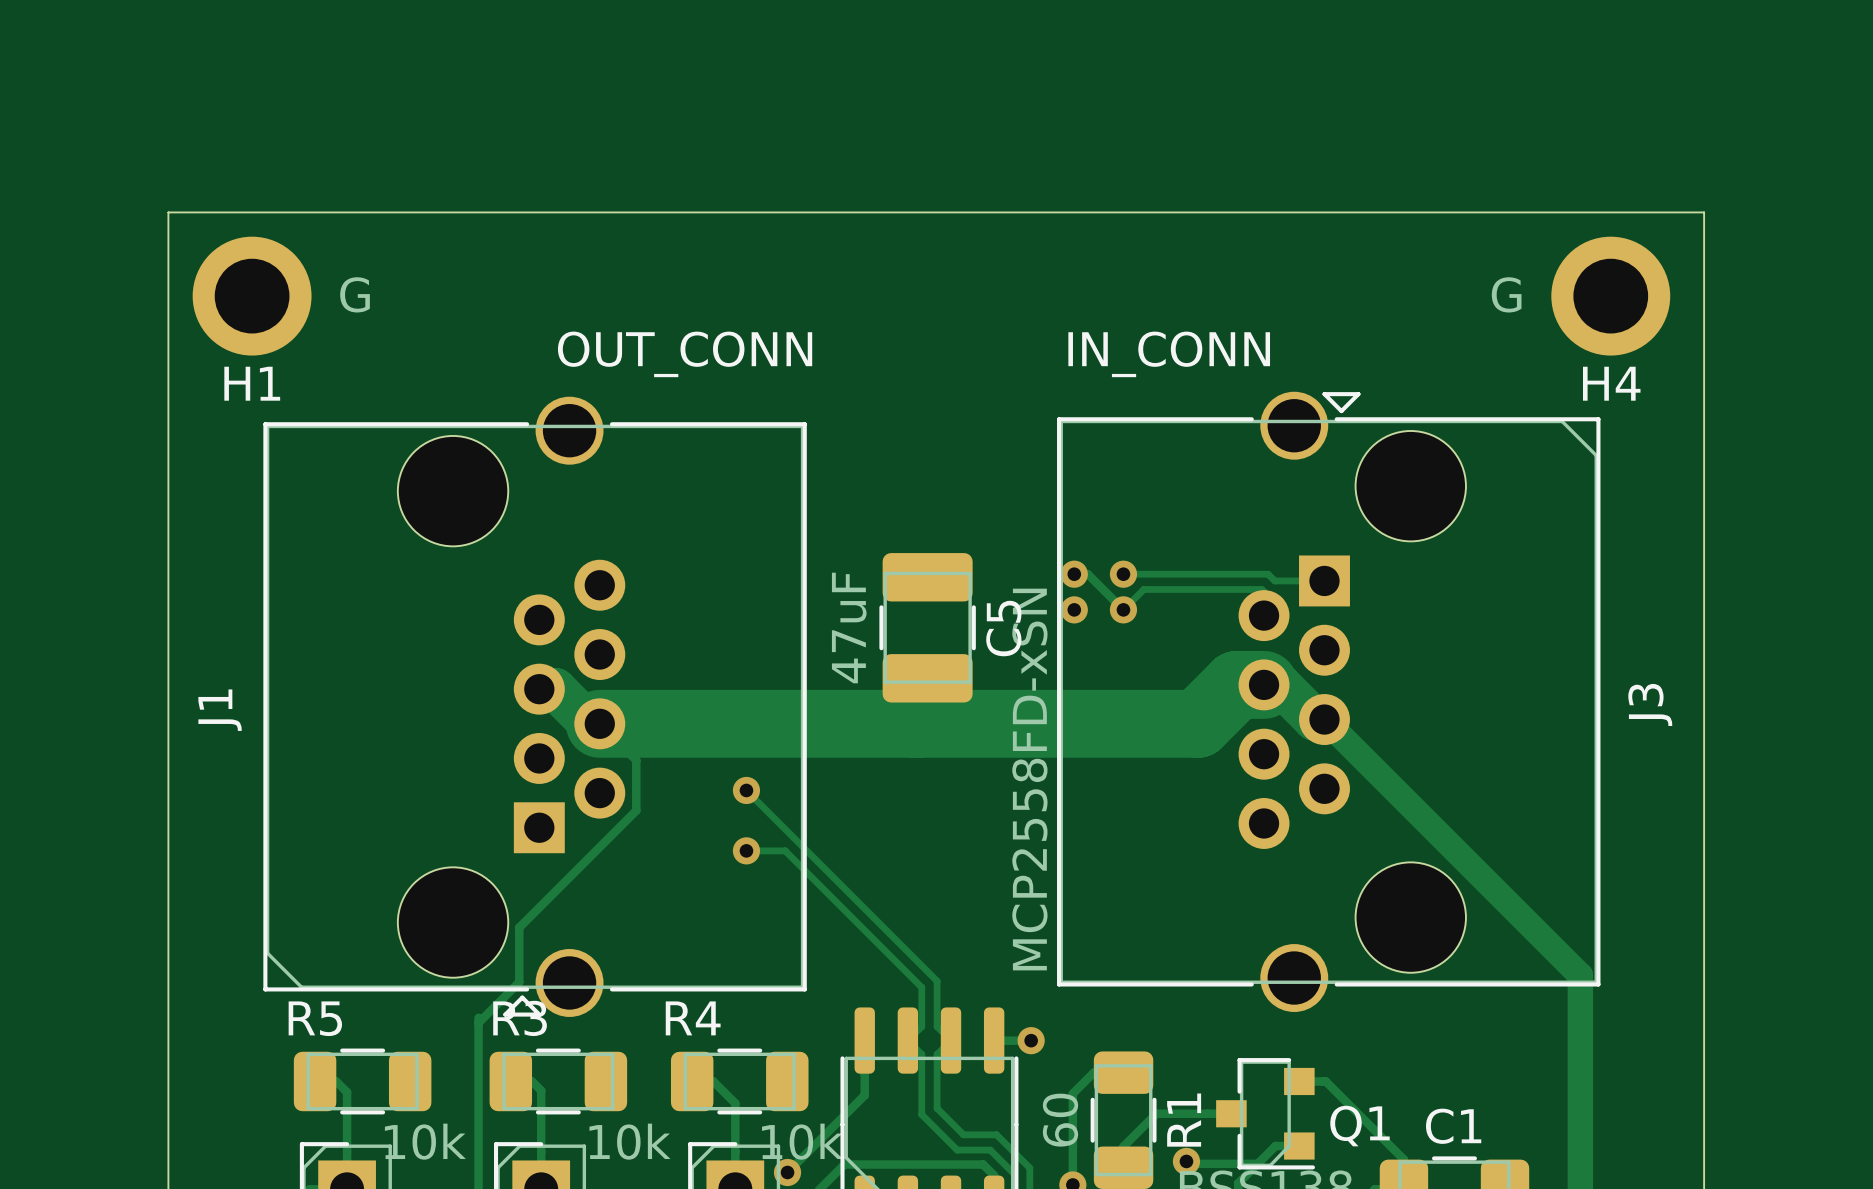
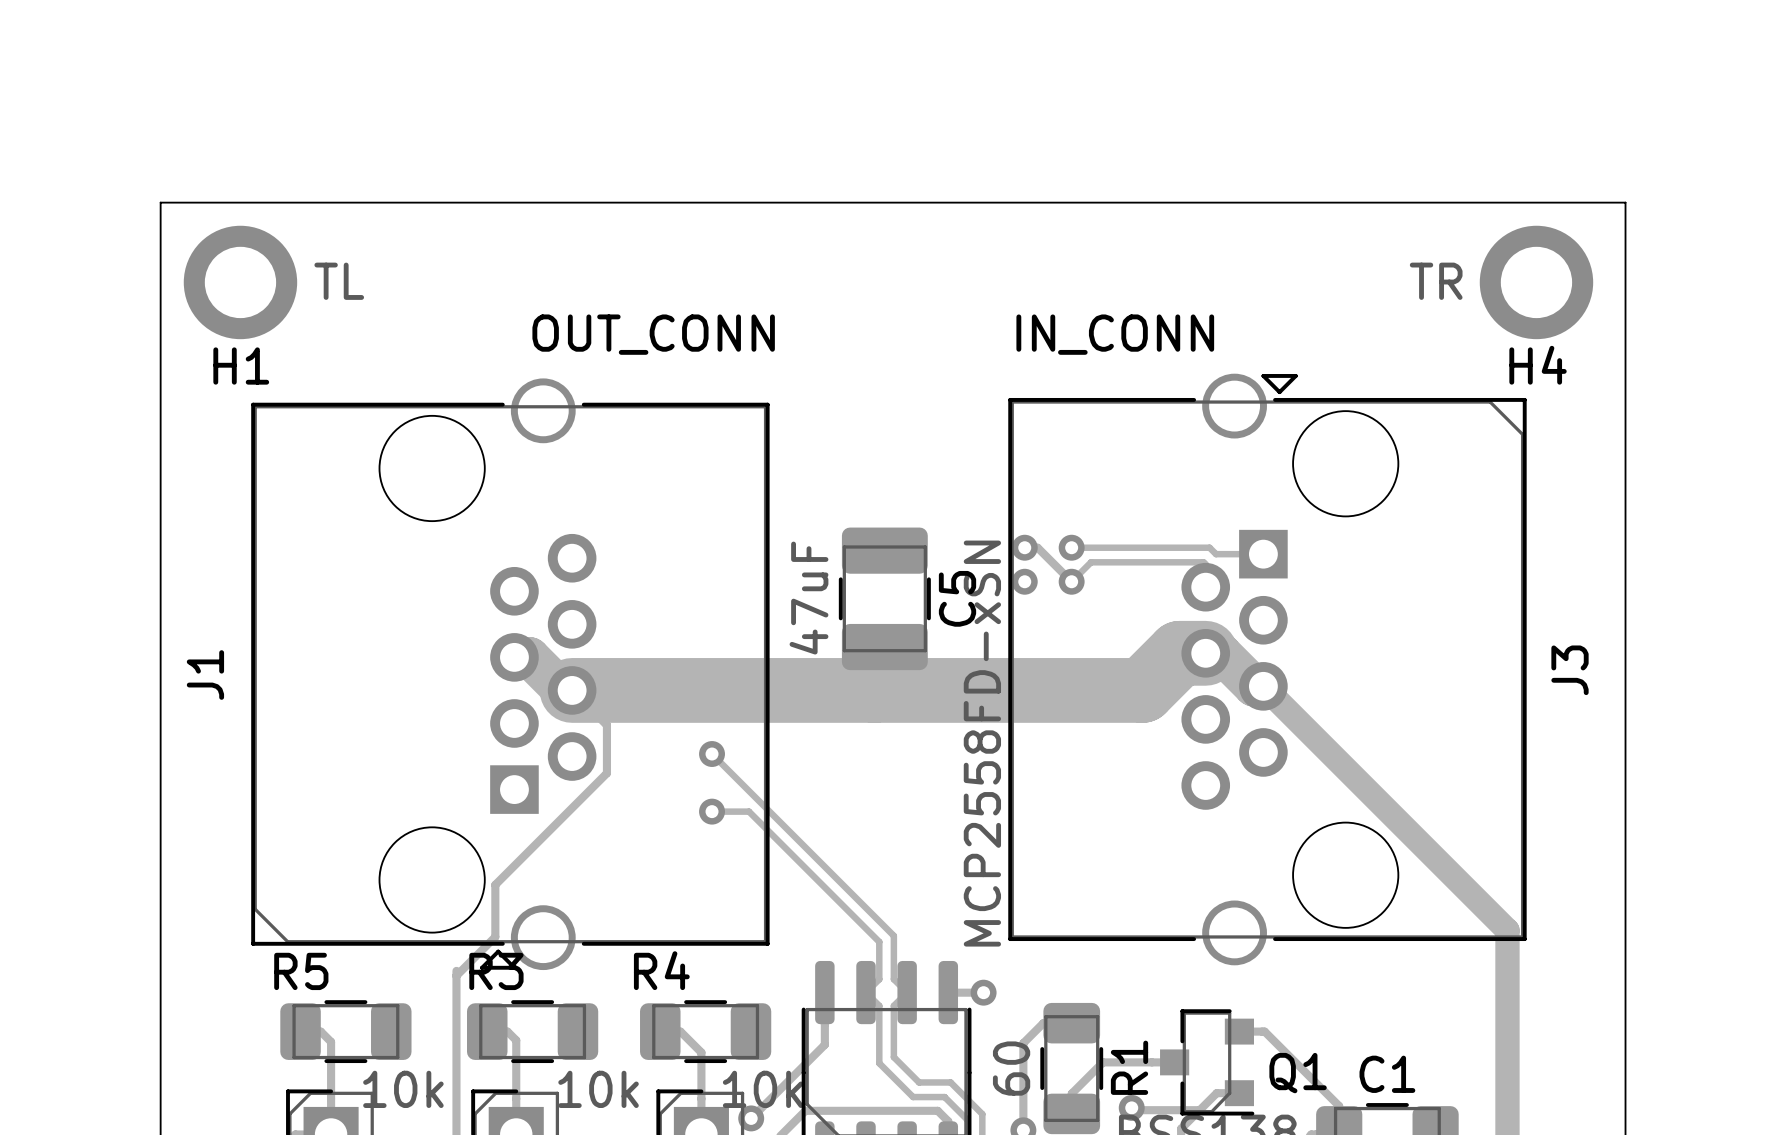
H1 value: G (355, 294) -> TL (339, 281)
H4 value: G (1506, 294) -> TR (1436, 281)

